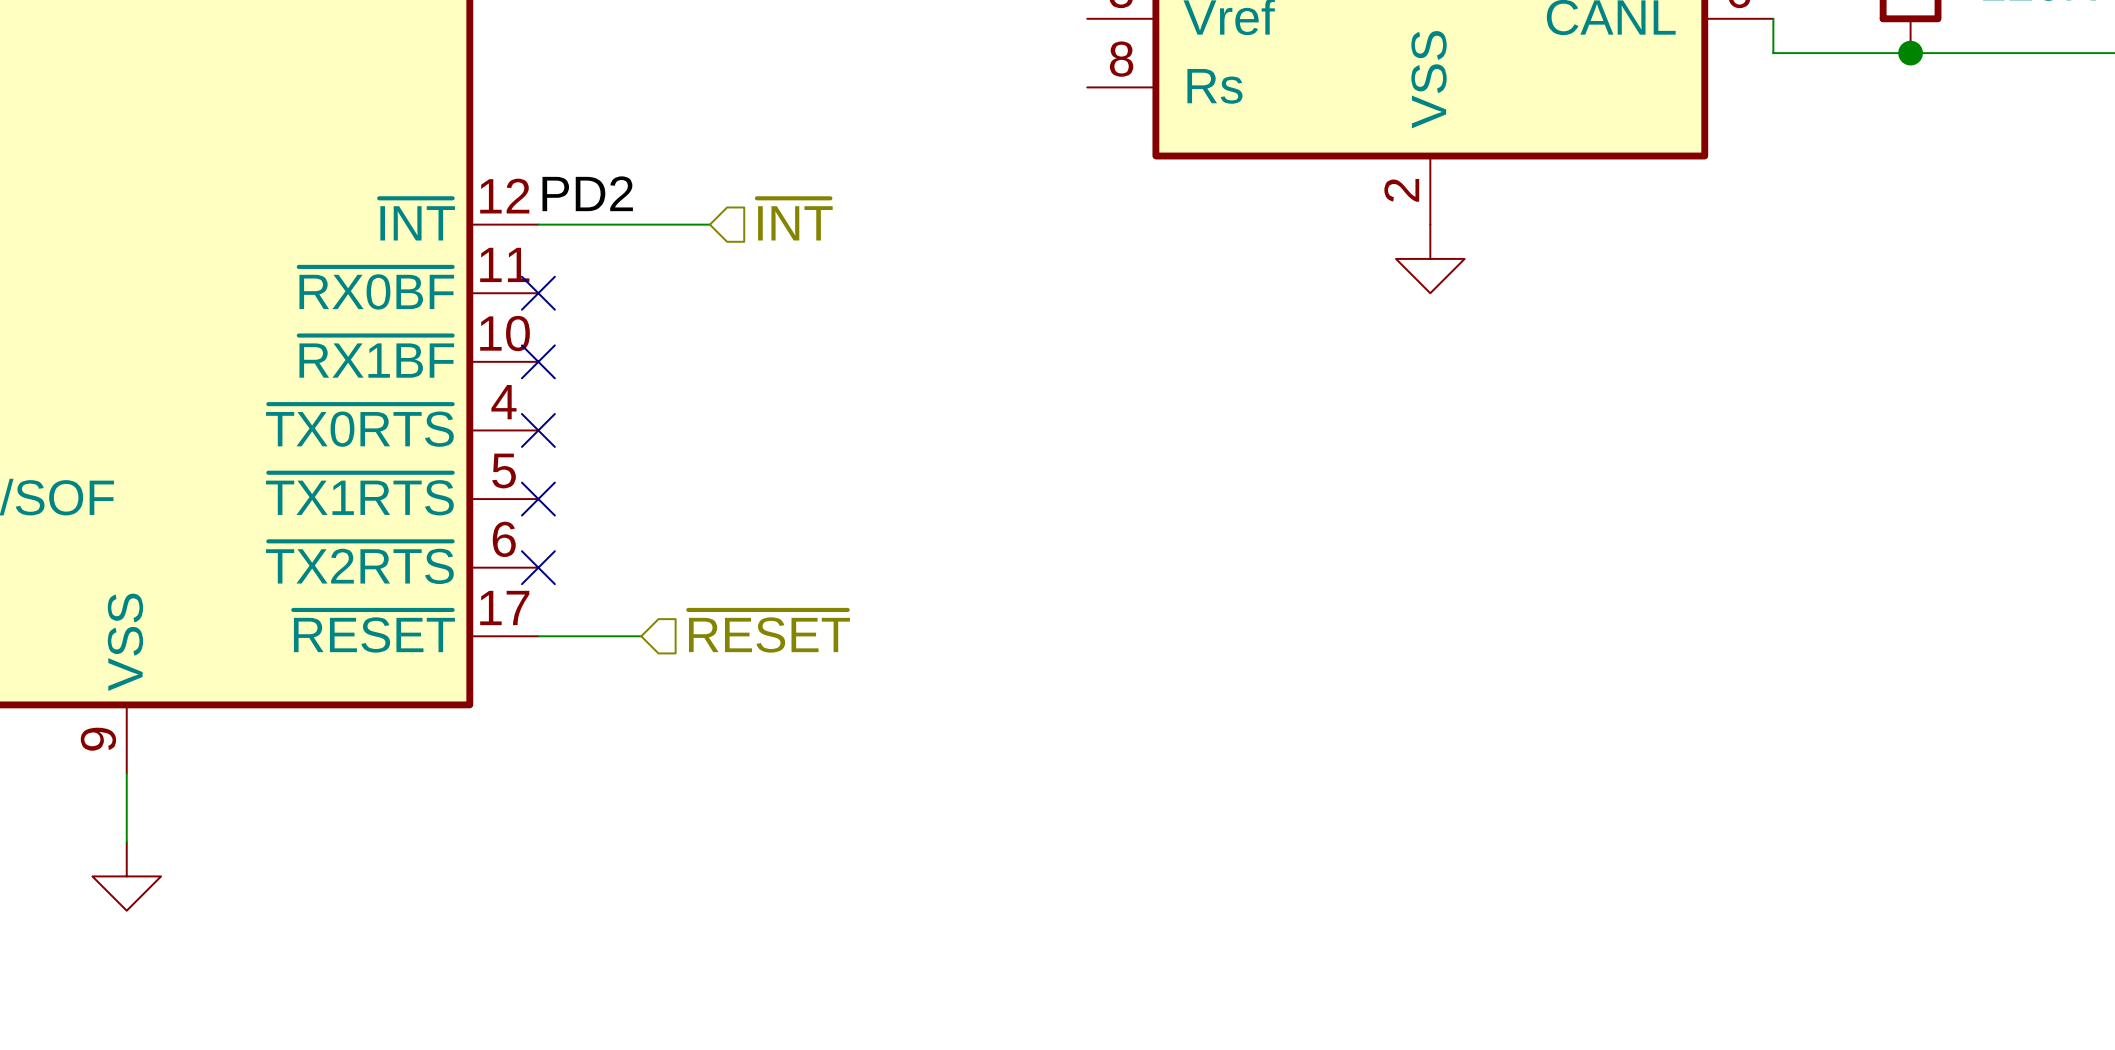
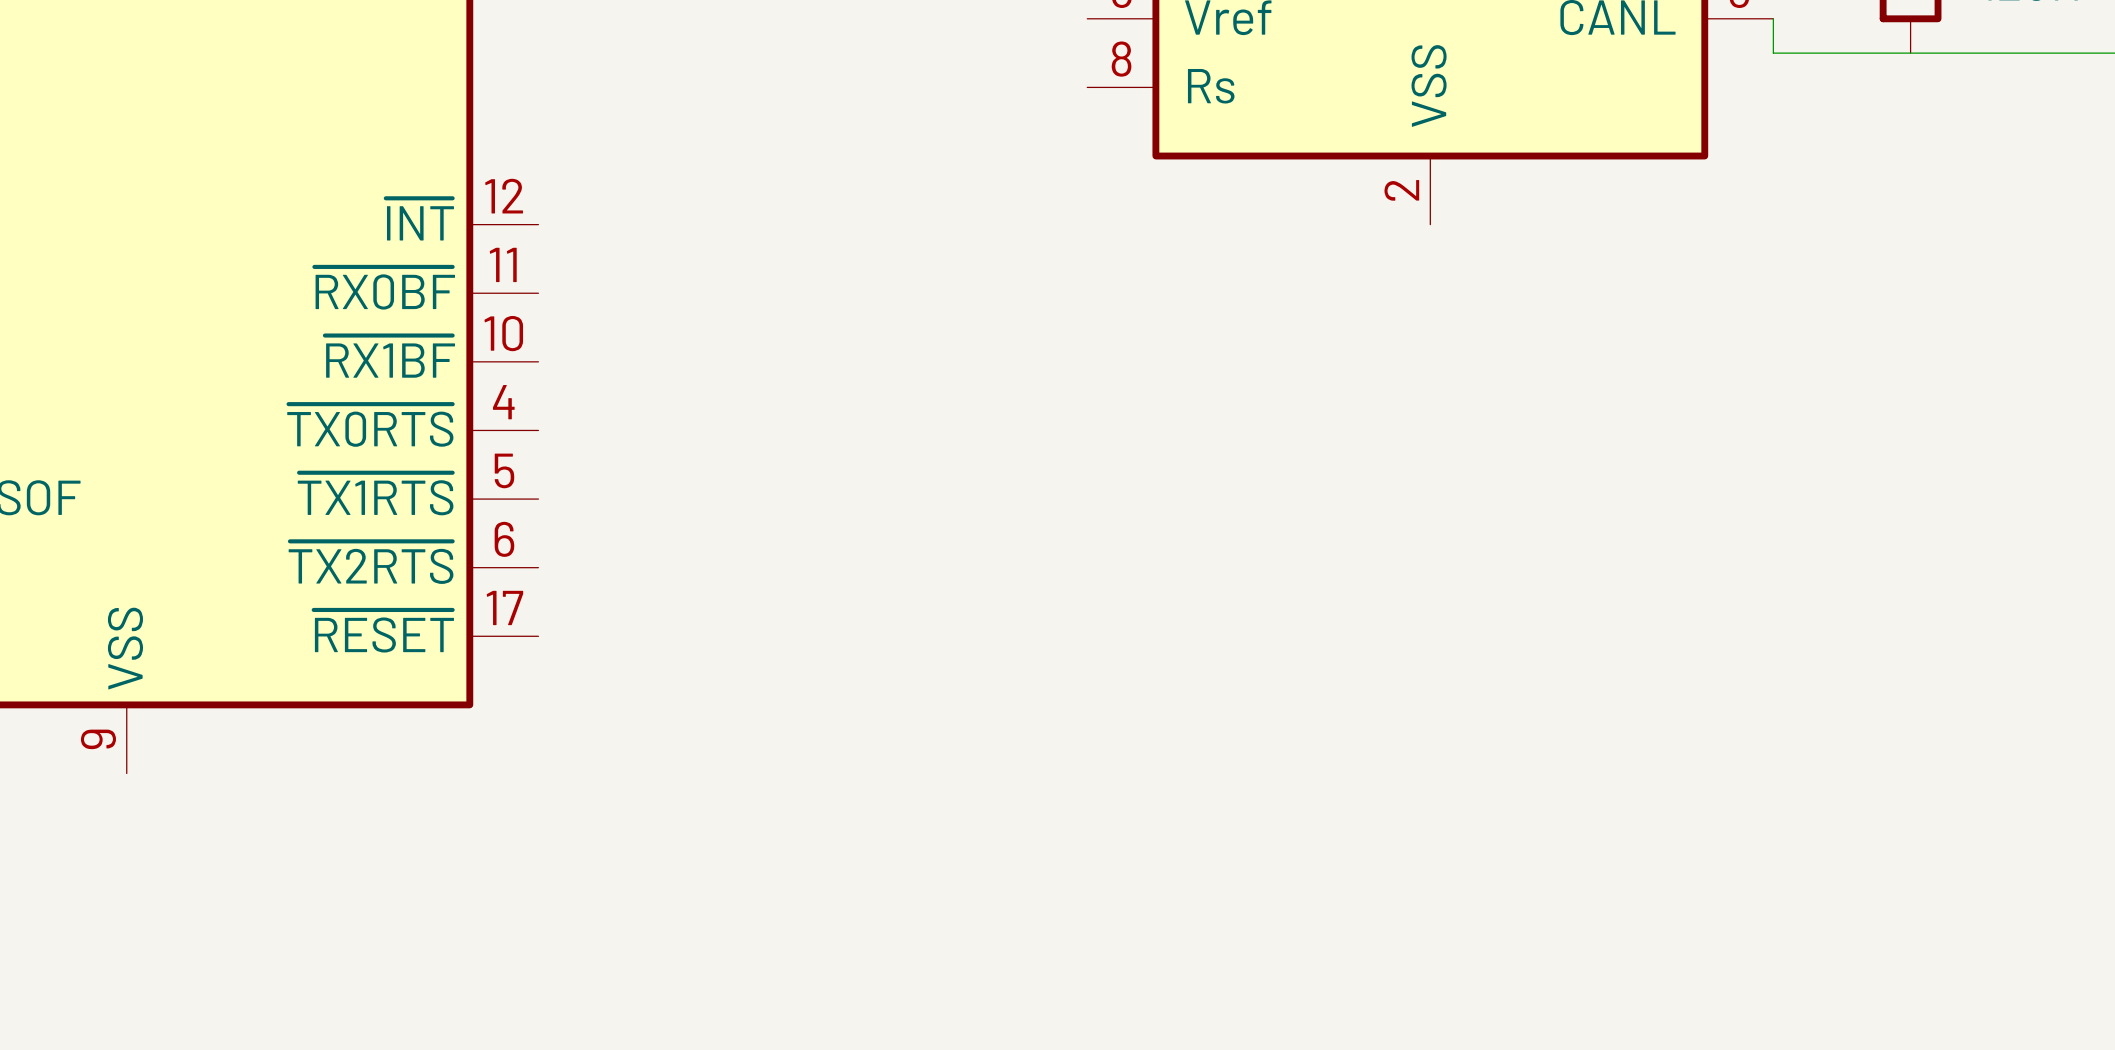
junction: (1910, 53) -> none
label: PD2 (587, 193) -> none
hierarchical label: ~{INT} (794, 219) -> none
wire: (538, 224) (709, 224) -> none
power symbol: (1430, 258) -> none
no-connect mark: (538, 293) -> none
no-connect mark: (538, 361) -> none
no-connect mark: (538, 430) -> none
no-connect mark: (538, 499) -> none
no-connect mark: (538, 567) -> none
hierarchical label: ~{RESET} (769, 631) -> none
wire: (538, 636) (641, 636) -> none
wire: (126, 773) (126, 842) -> none
power symbol: (126, 876) -> none

